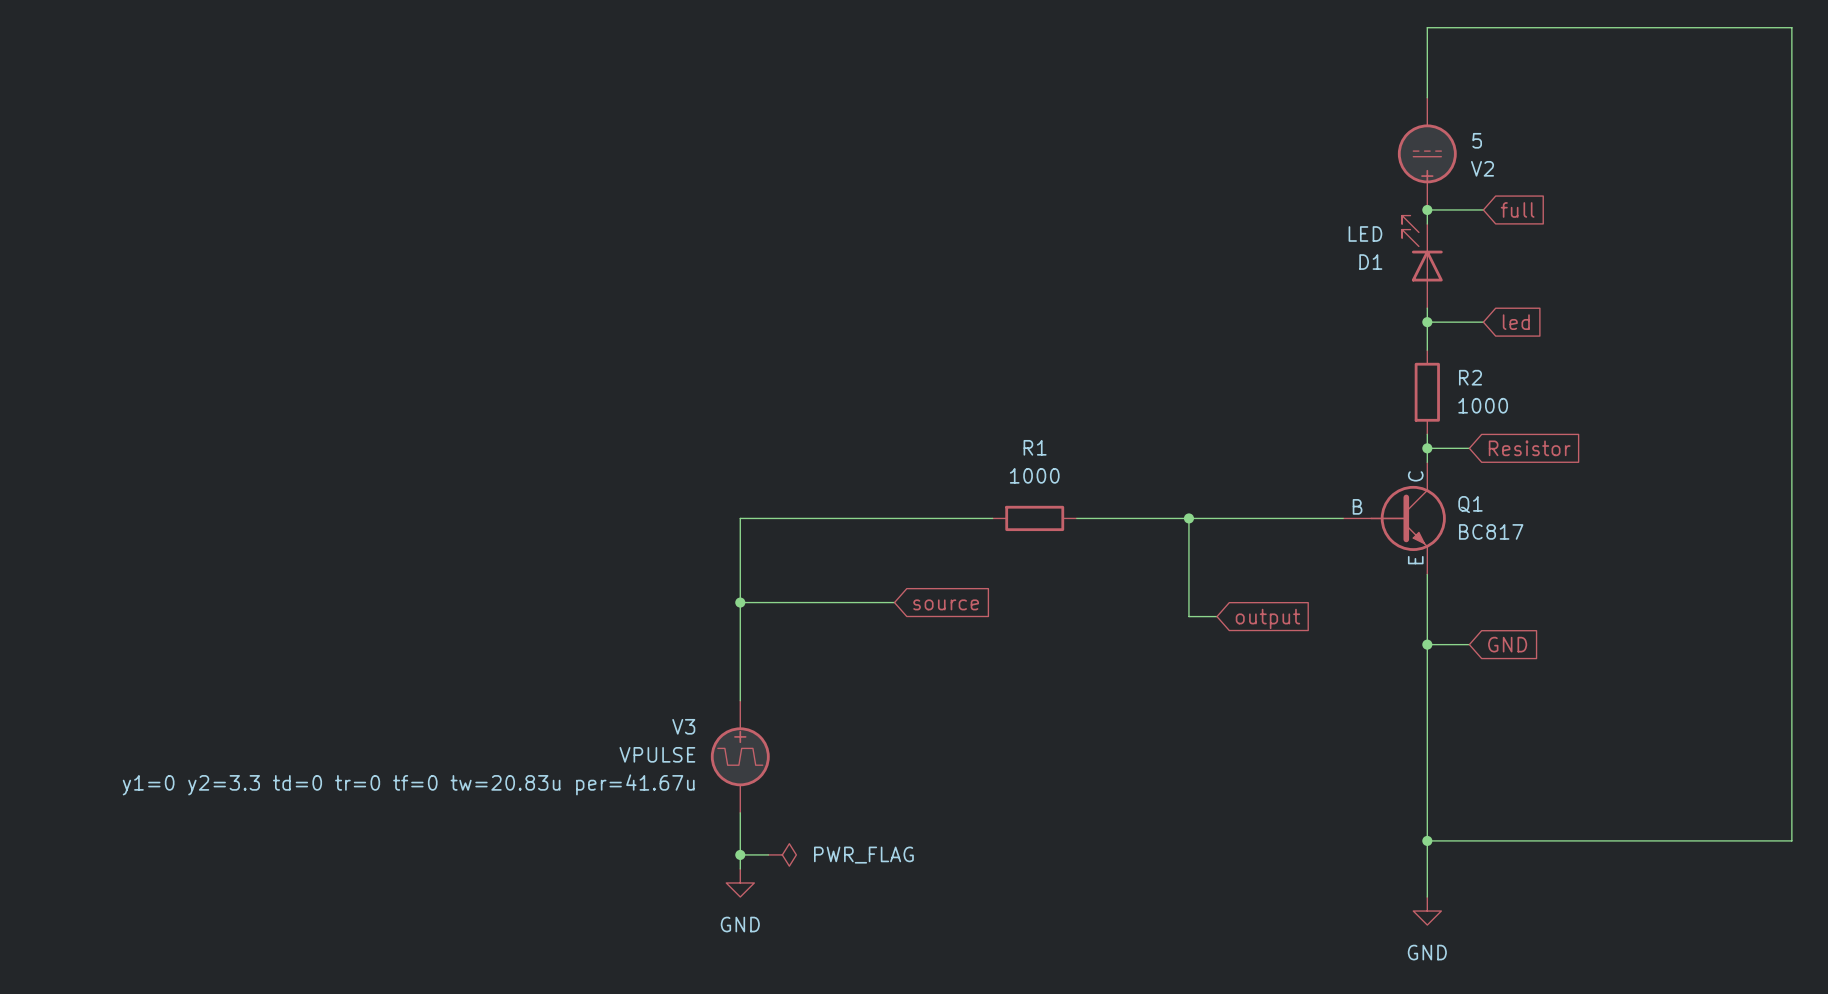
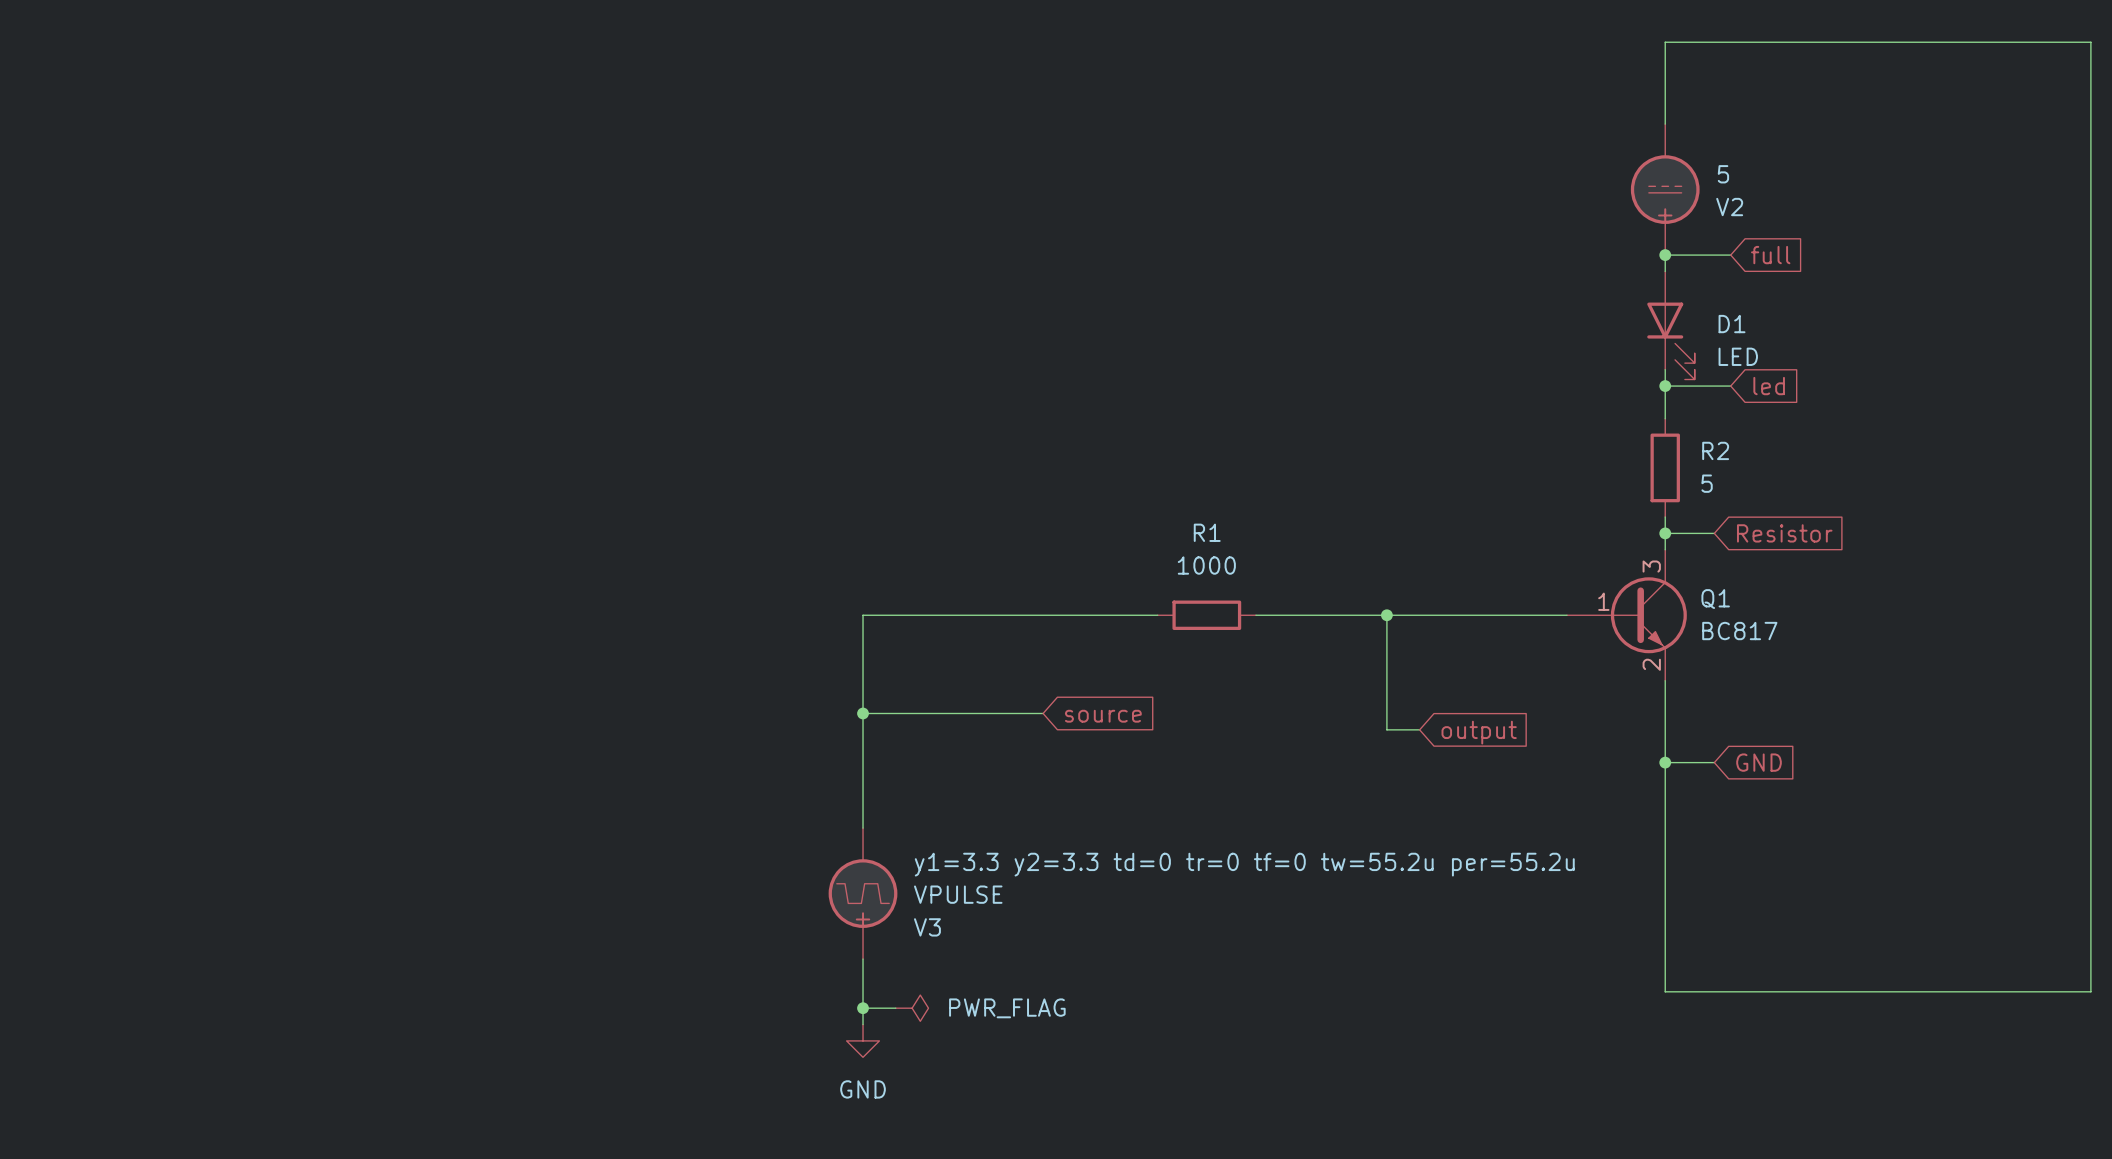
D1 rotation: 0° (1422, 248) -> 180° (1670, 341)
R2 value: 1000 (1483, 405) -> 5 (1707, 483)
Q1 symbol: [1343, 462, 1446, 575] -> [1567, 549, 1687, 681]
V3 rotation: 0° (740, 756) -> 180° (863, 893)
V3 text: y1=0 y2=3.3 td=0 tr=0 tf=0 tw=20.83u per=41.67u (408, 784) -> y1=3.3 y2=3.3 td=0 tr=0 tf=0 tw=55.2u per=55.2u (1244, 864)
wire: (1427, 840) (1427, 897) -> none
junction: (1427, 840) -> none
power symbol: GND (1427, 911) -> none

